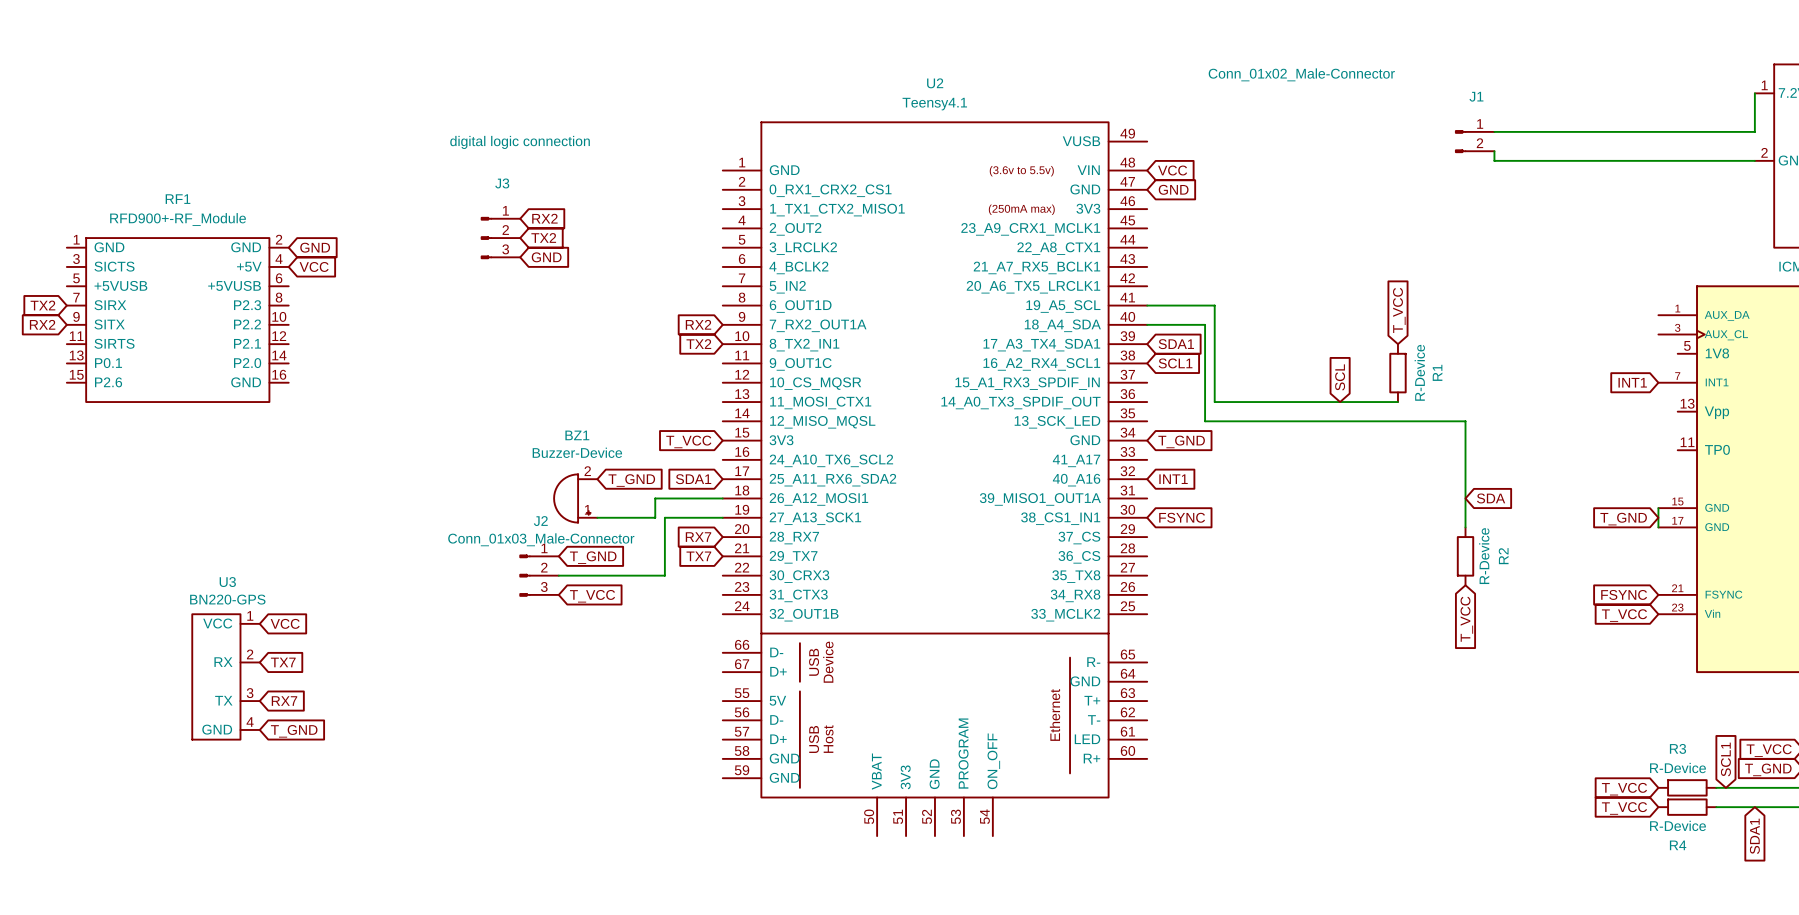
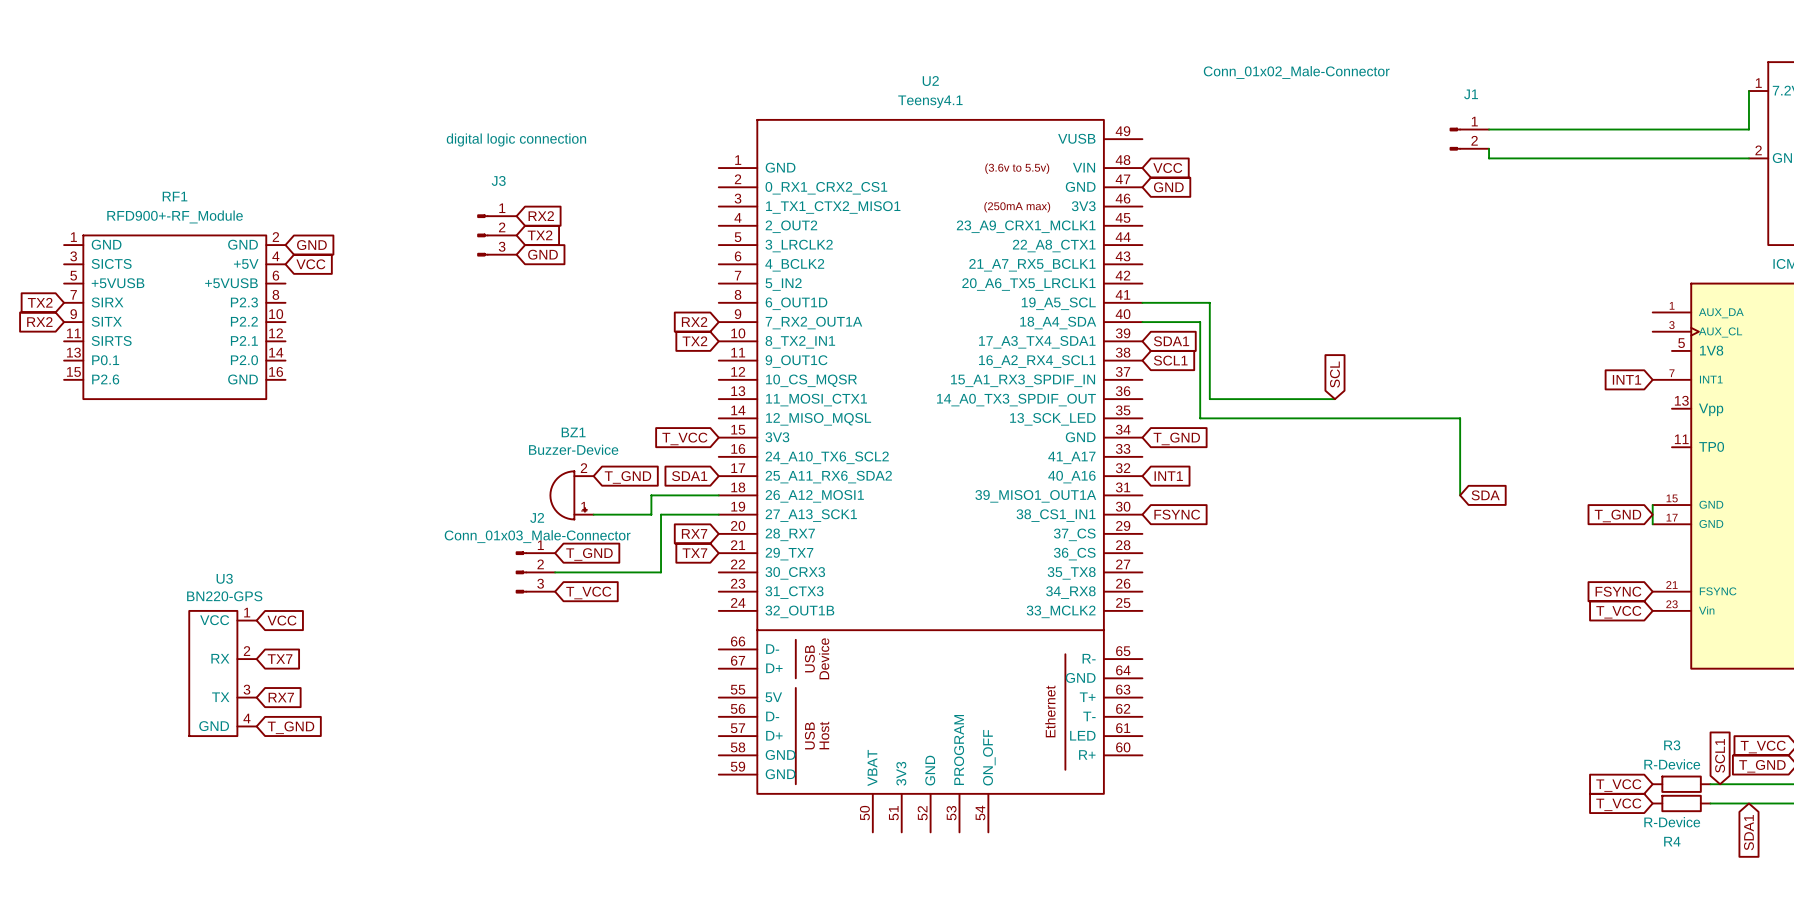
global label: T_VCC (1399, 310) -> none
R1: R-Device (1397, 373) -> none
wire: (1340, 402) (1397, 402) -> none
wire: (1465, 498) (1465, 527) -> none
R2: R-Device (1465, 556) -> none
global label: T_VCC (1466, 619) -> none

